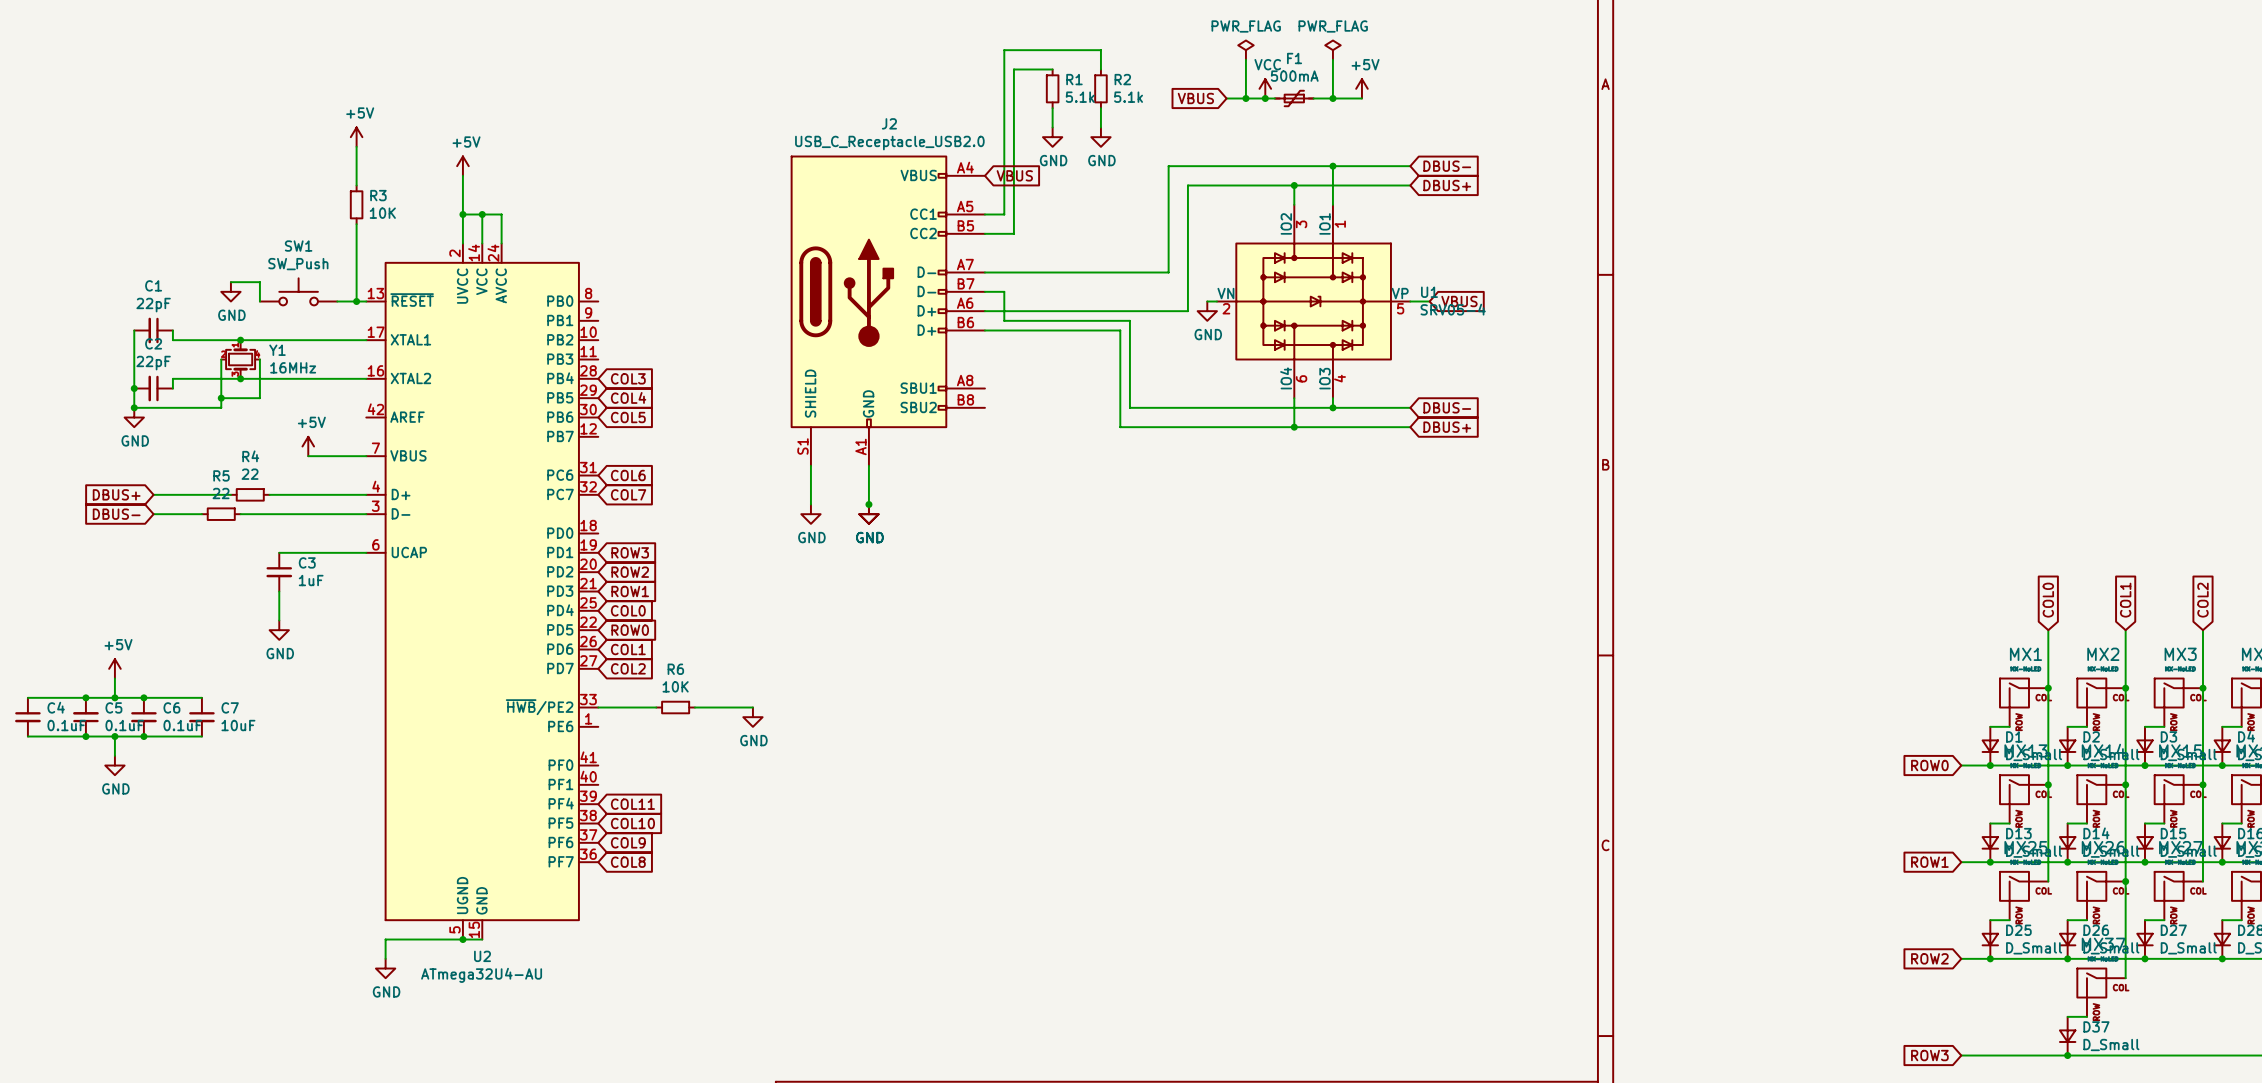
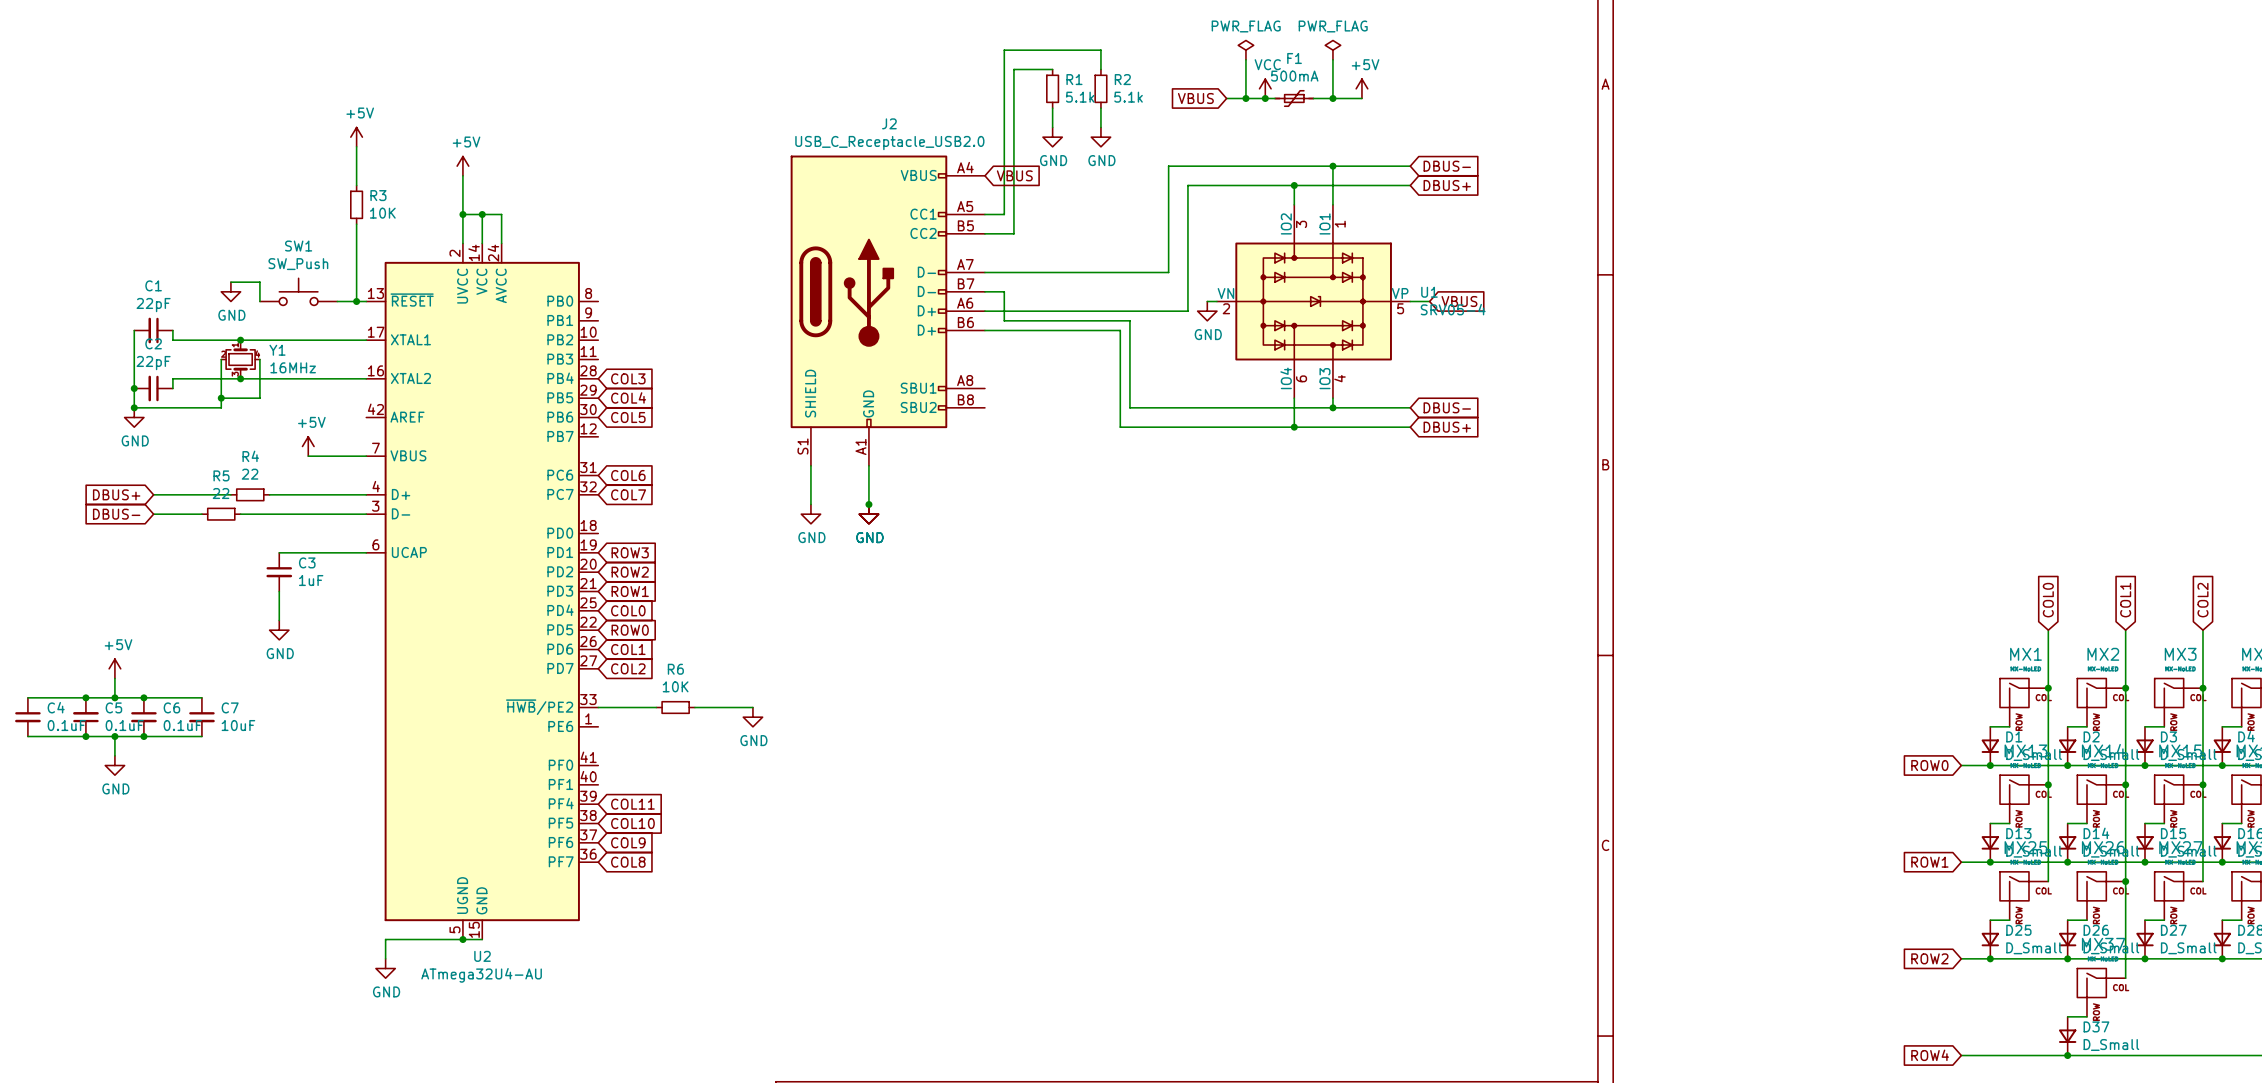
global label: ROW3 (1929, 1055) -> ROW4 (1930, 1055)

